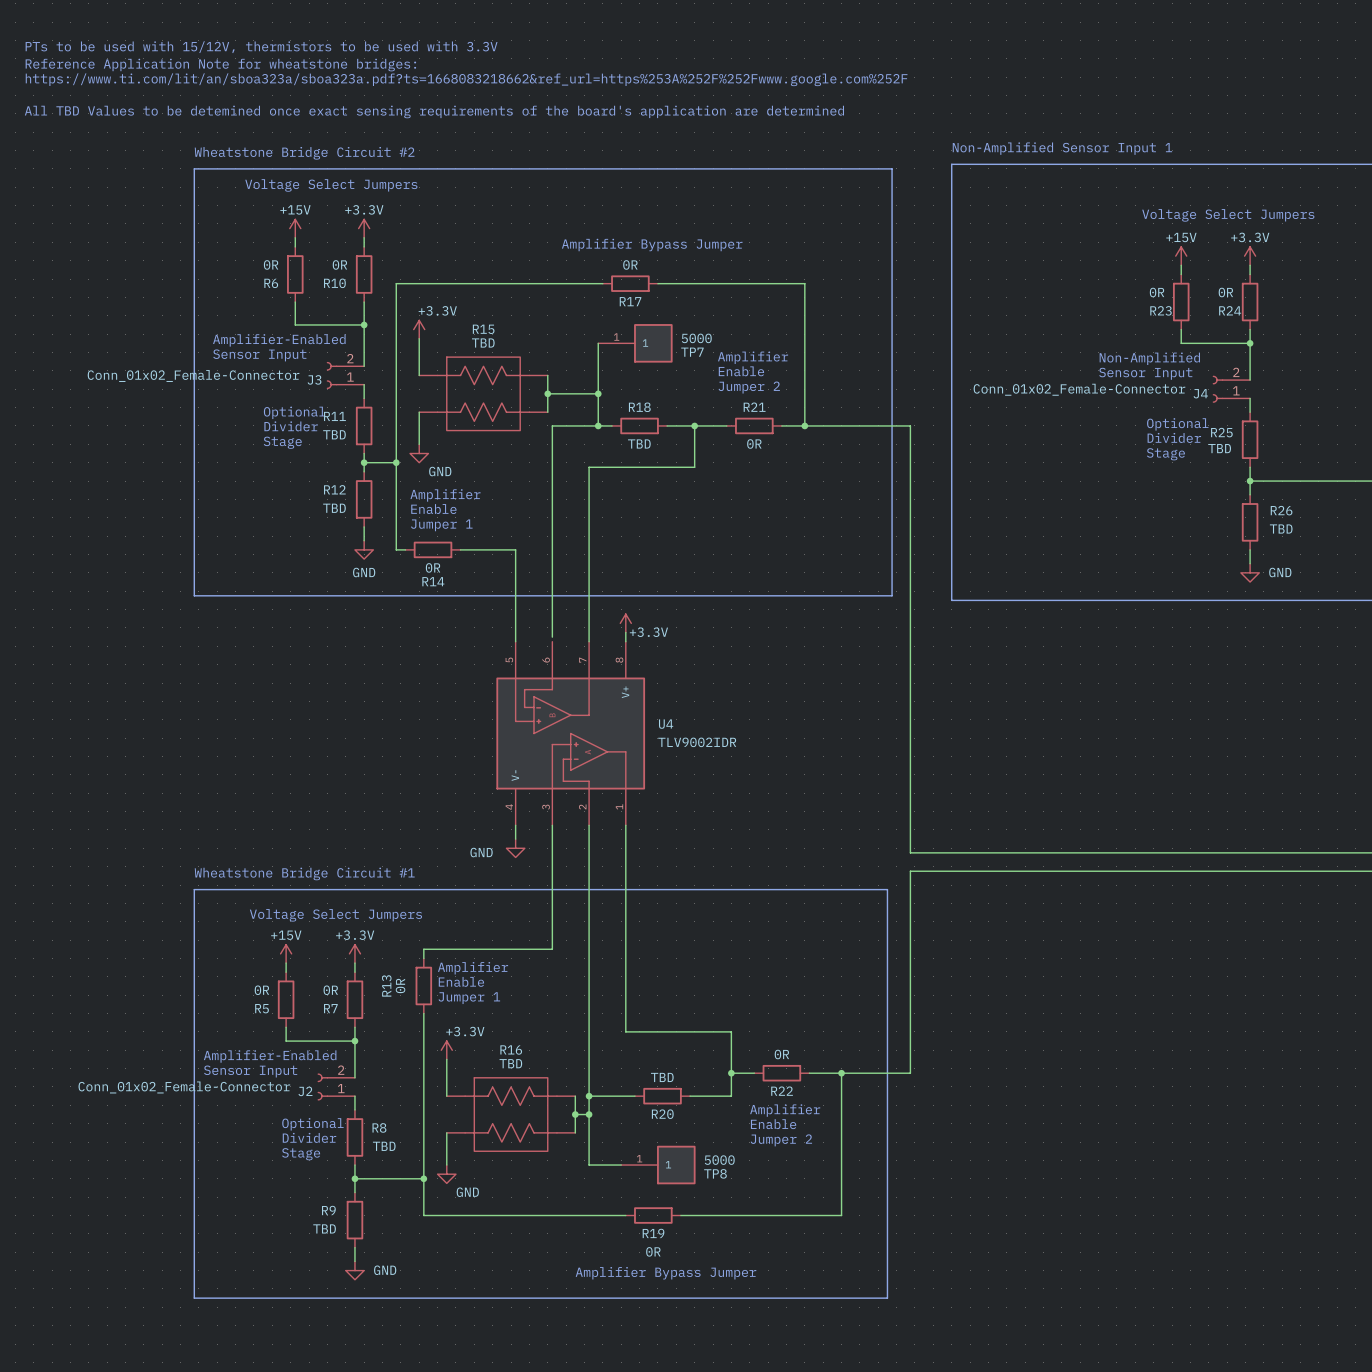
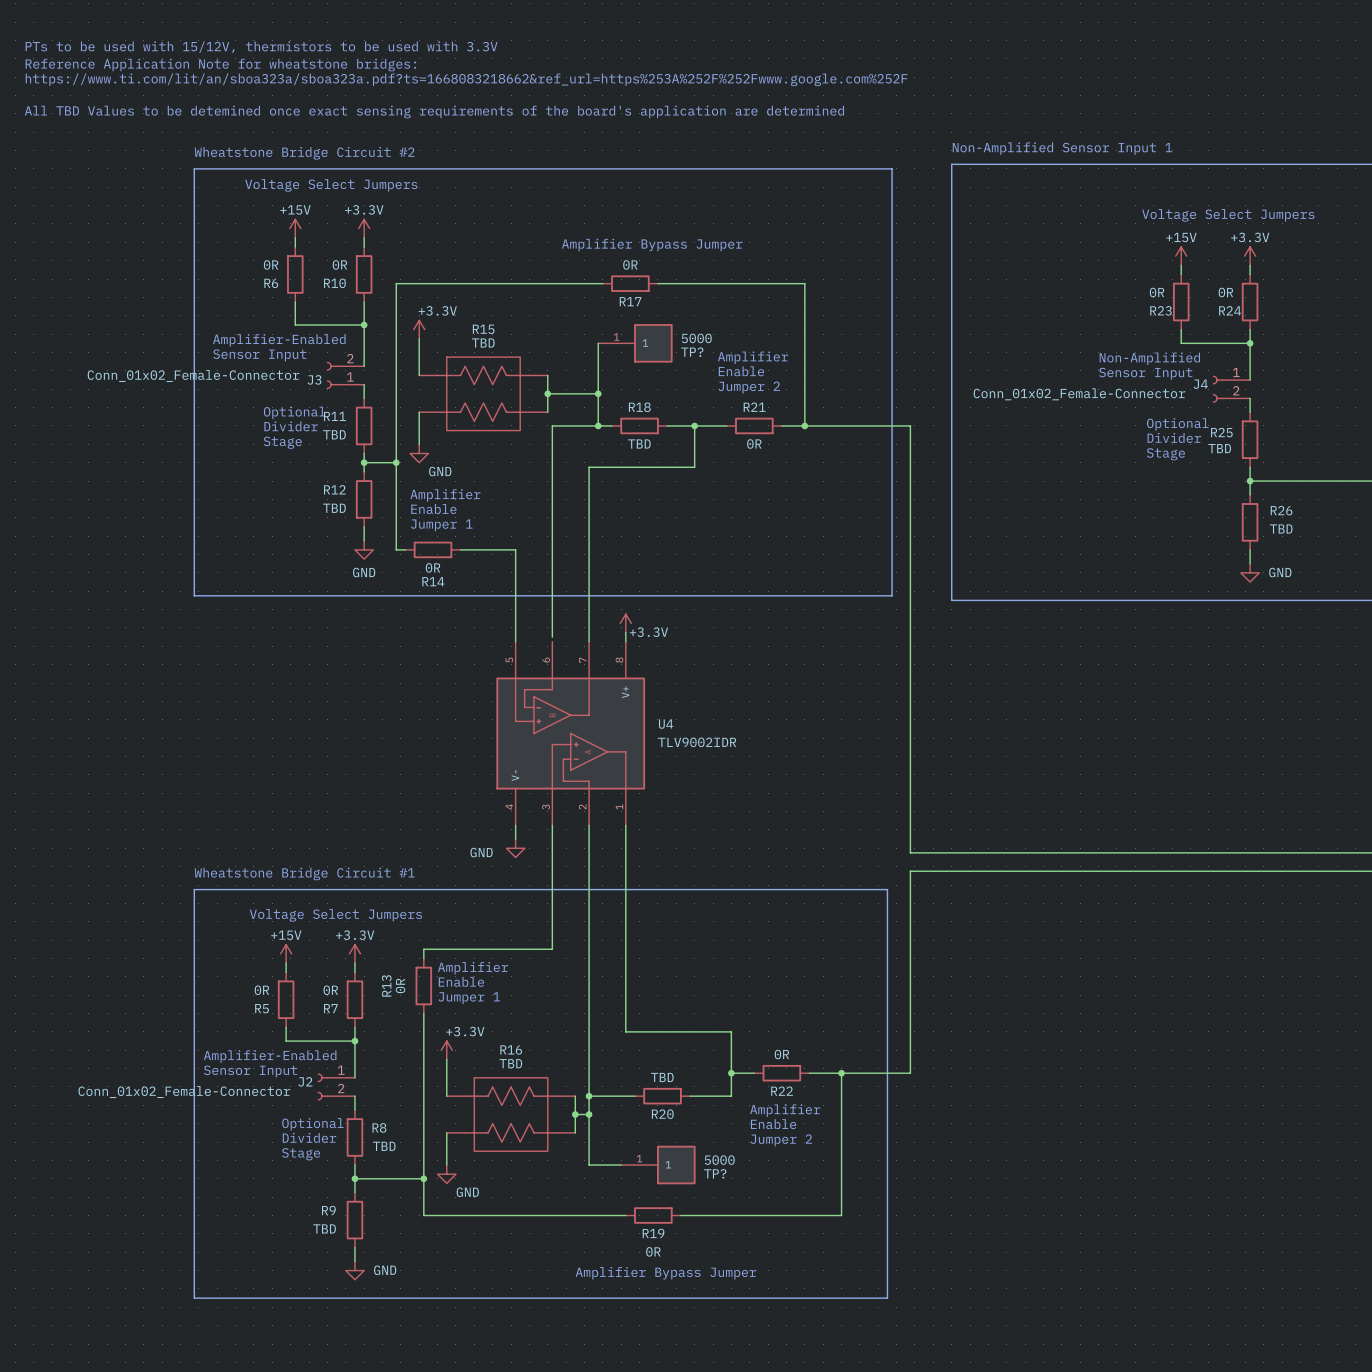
TP7 name: TP7 (692, 352) -> TP? (692, 352)
J4 flip: as is (1217, 389) -> up-down (1217, 389)
J2 flip: as is (322, 1086) -> up-down (322, 1086)
TP8 name: TP8 (715, 1173) -> TP? (715, 1173)

